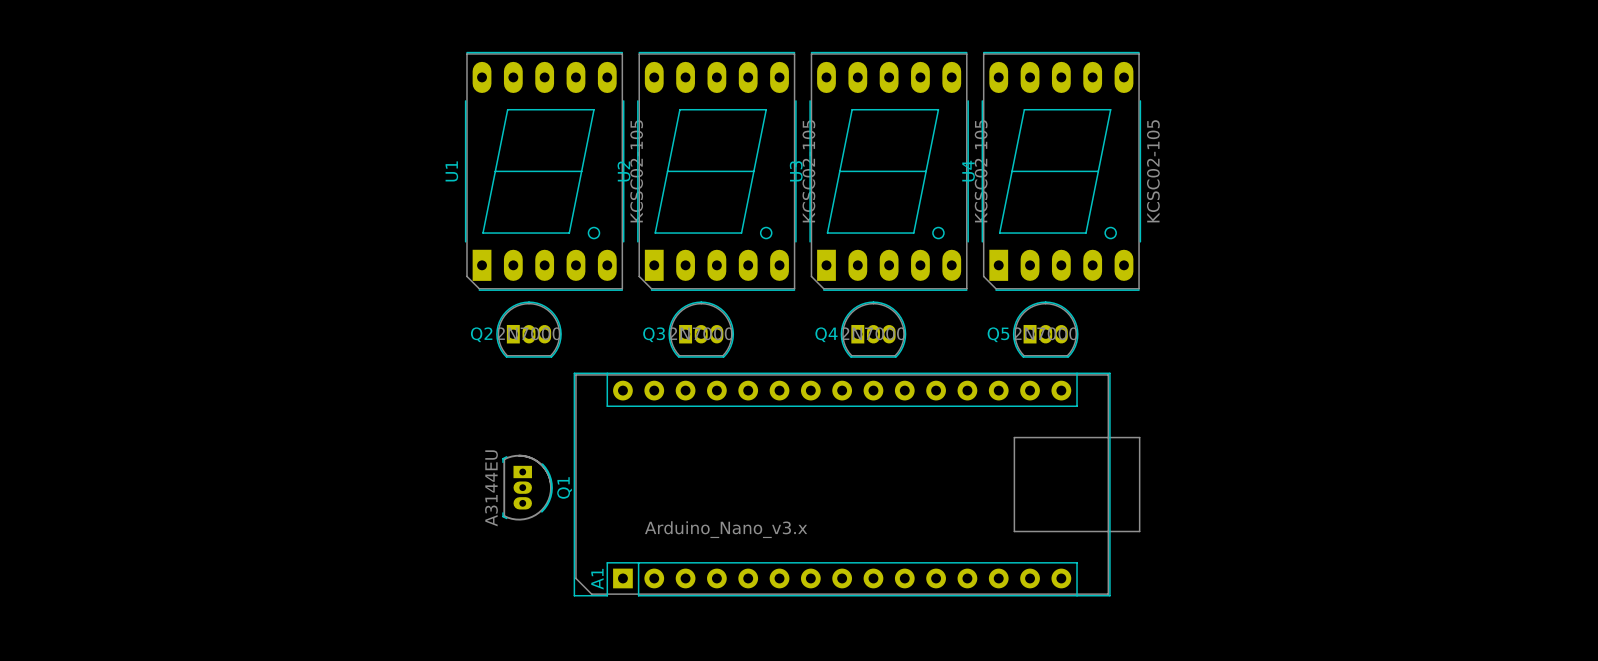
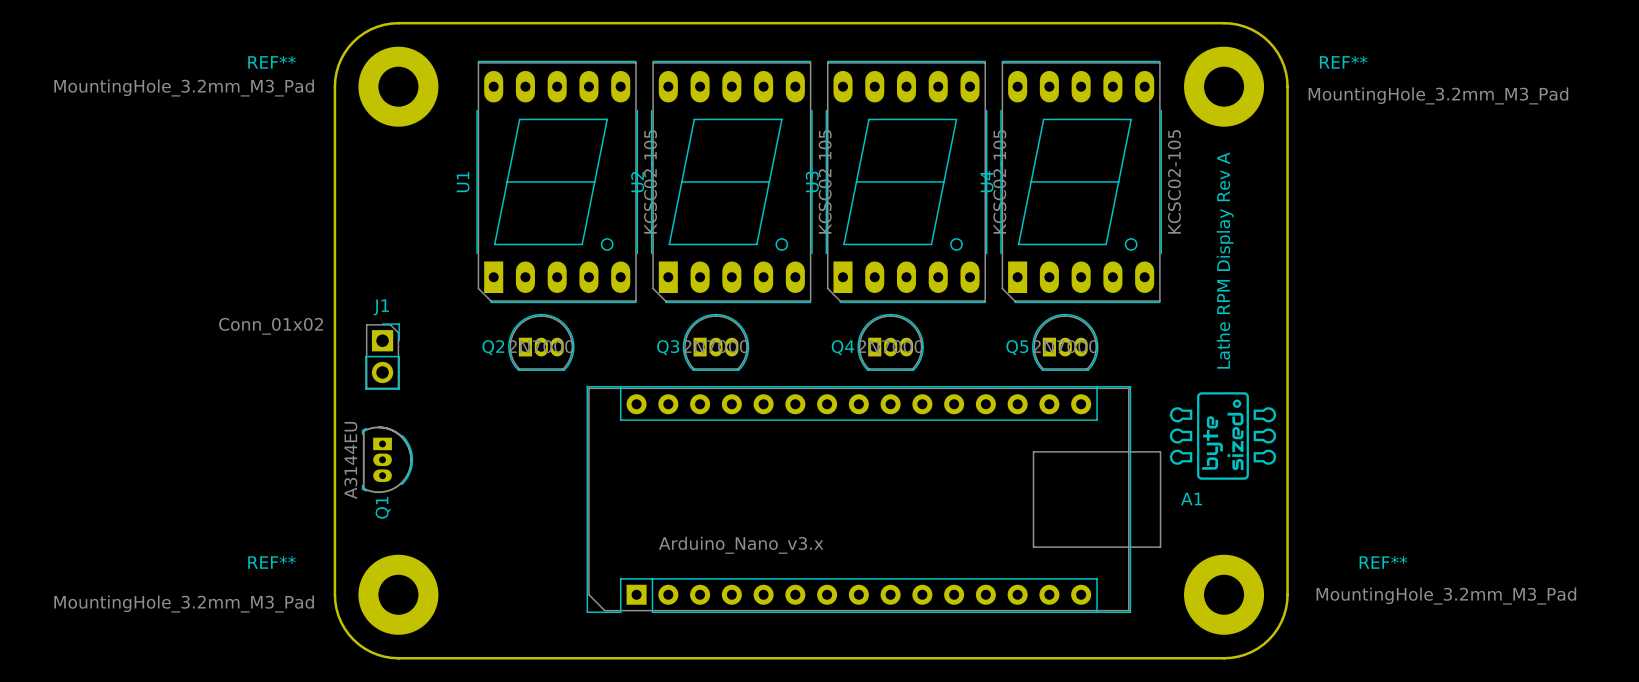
board edge: none -> (398, 23) (1224, 23) (1238, 24) (1257, 32) (1268, 41) (1277, 52) (1285, 72) (1287, 86) (1287, 594) (1285, 608) (1277, 628) (1268, 639) (1257, 648) (1238, 656) (1224, 658) (398, 658) (384, 656) (364, 648) (353, 639) (344, 628) (336, 608) (334, 594) (334, 86) (336, 72) (341, 59) (353, 41) (370, 29) (384, 24) (398, 23)
REF**: none -> MountingHole_3.2mm_M3_Pad (398, 86)
REF**: none -> MountingHole_3.2mm_M3_Pad (1224, 86)
text: none -> Lathe RPM Display Rev A (1225, 260)
J1: none -> Conn_01x02 (382, 356)
drawing: none -> [1169, 392, 1277, 480]
Q1 position: (527, 487) -> (387, 459)
Q1 name position: Q1 (564, 487) -> Q1 (383, 507)
REF**: none -> MountingHole_3.2mm_M3_Pad (398, 594)
REF**: none -> MountingHole_3.2mm_M3_Pad (1224, 594)
A1 name rotation: 0° (597, 579) -> 90° clockwise (1191, 499)
A1 name position: A1 (597, 579) -> A1 (1191, 499)

